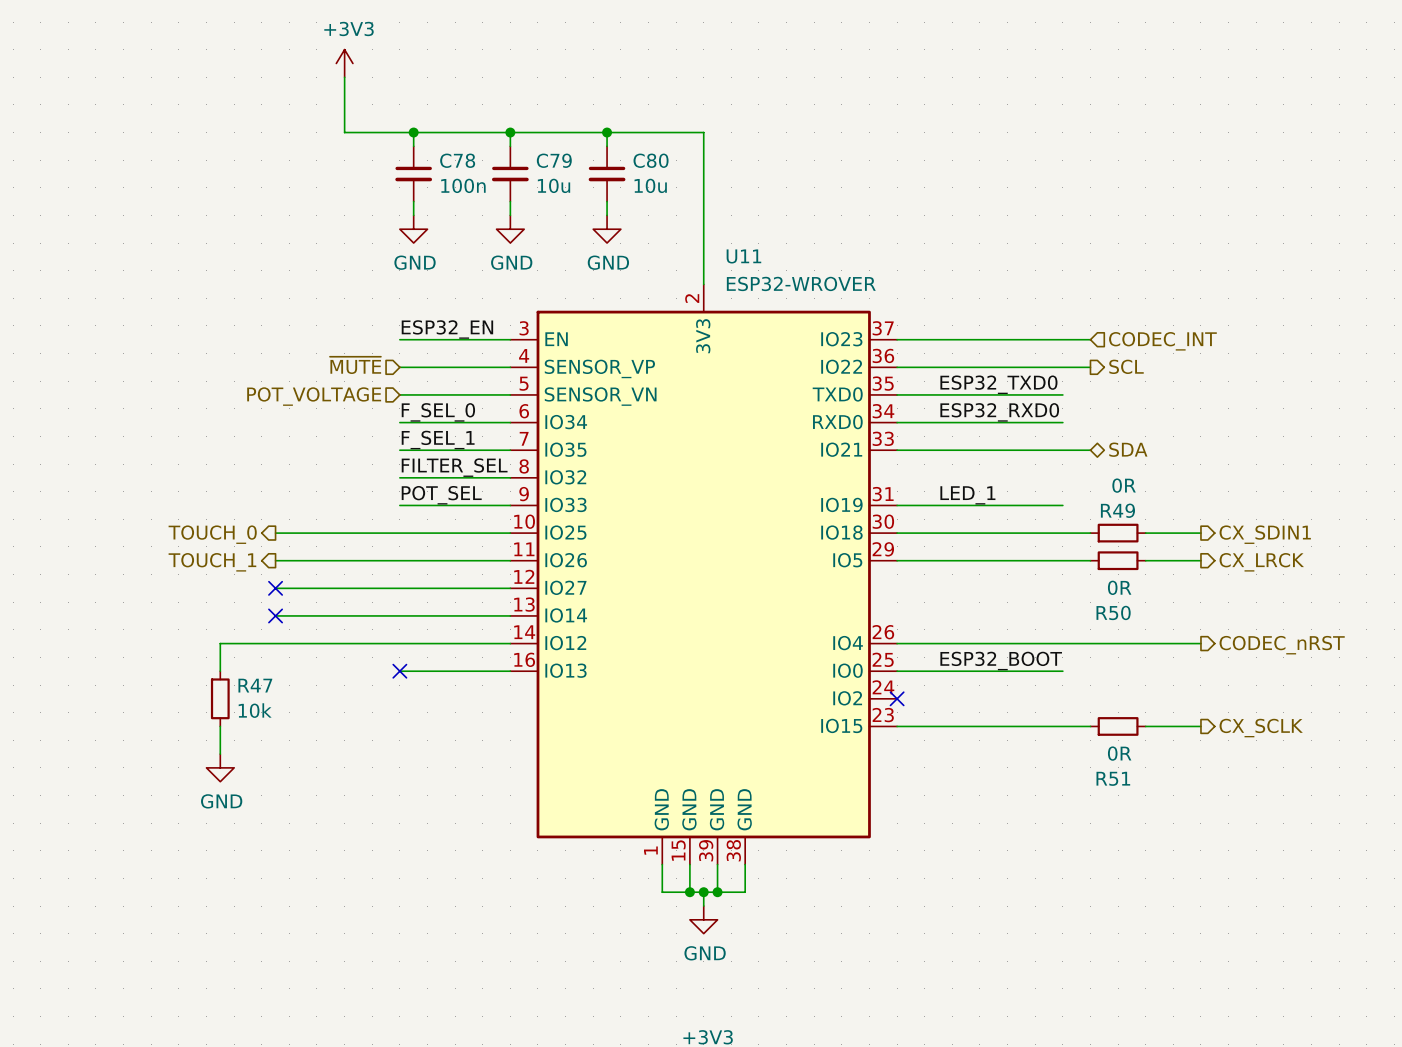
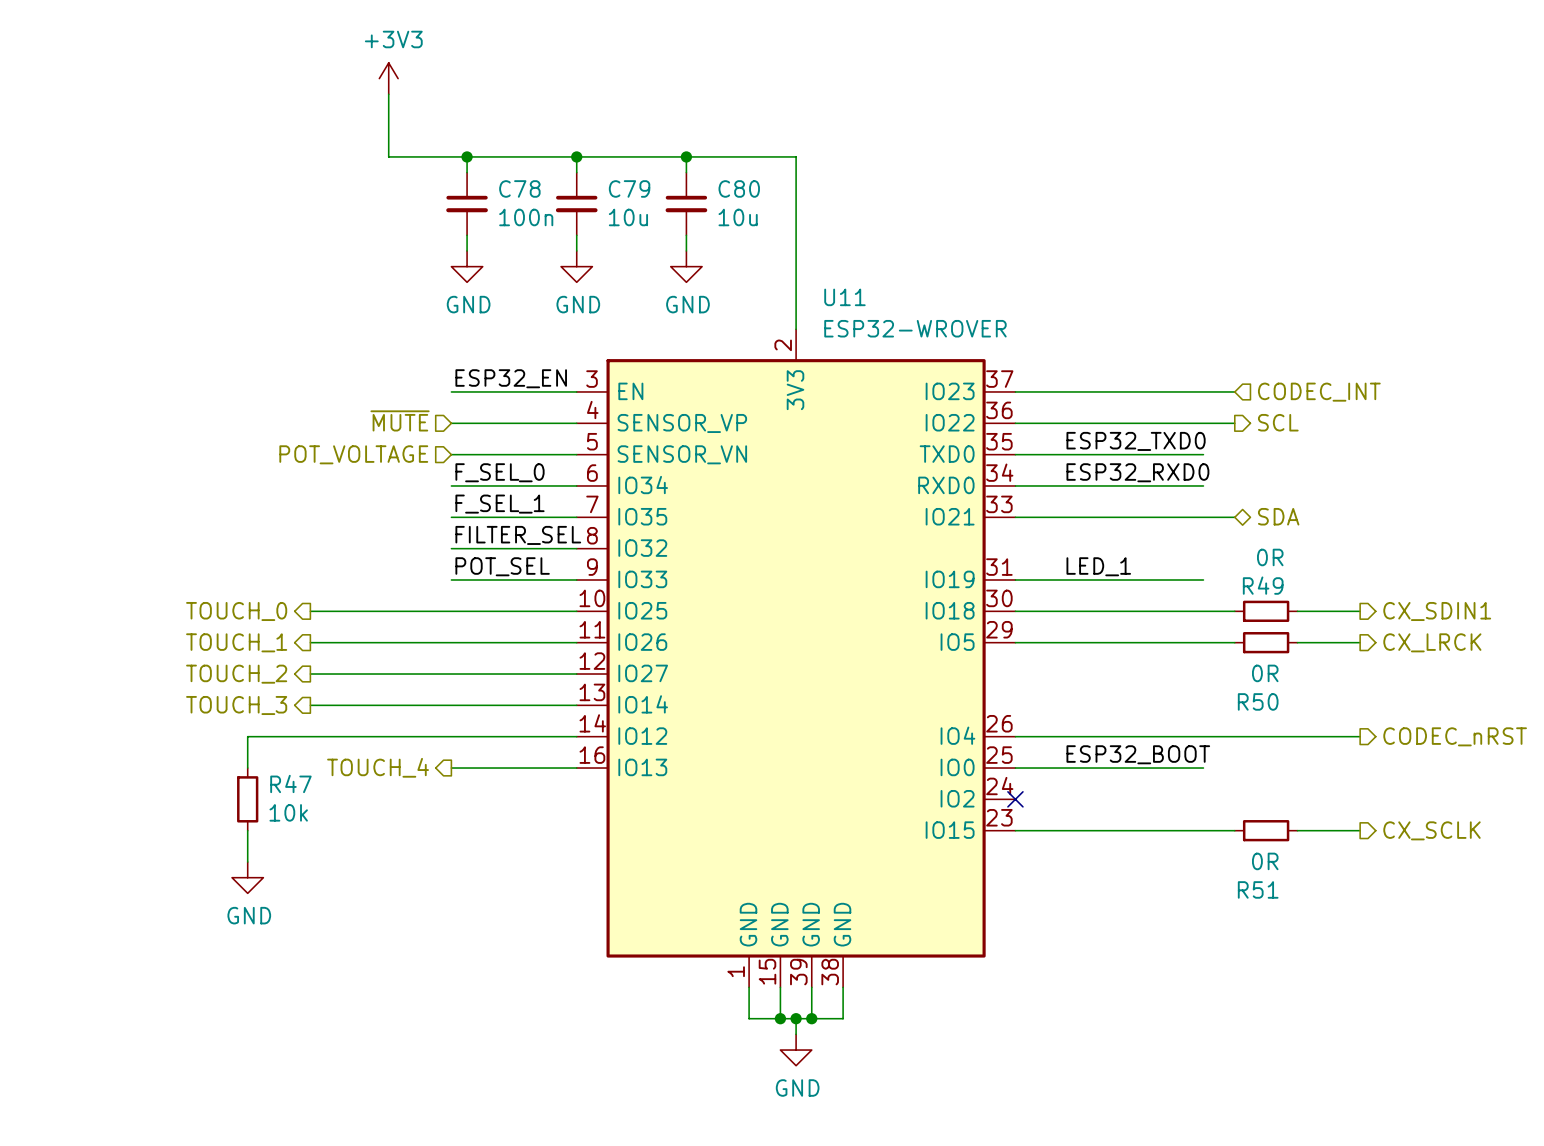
no-connect mark: (275, 588) -> none
hierarchical label: none -> TOUCH_2 (236, 674)
no-connect mark: (275, 615) -> none
hierarchical label: none -> TOUCH_3 (236, 705)
no-connect mark: (399, 671) -> none
hierarchical label: none -> TOUCH_4 (378, 767)

